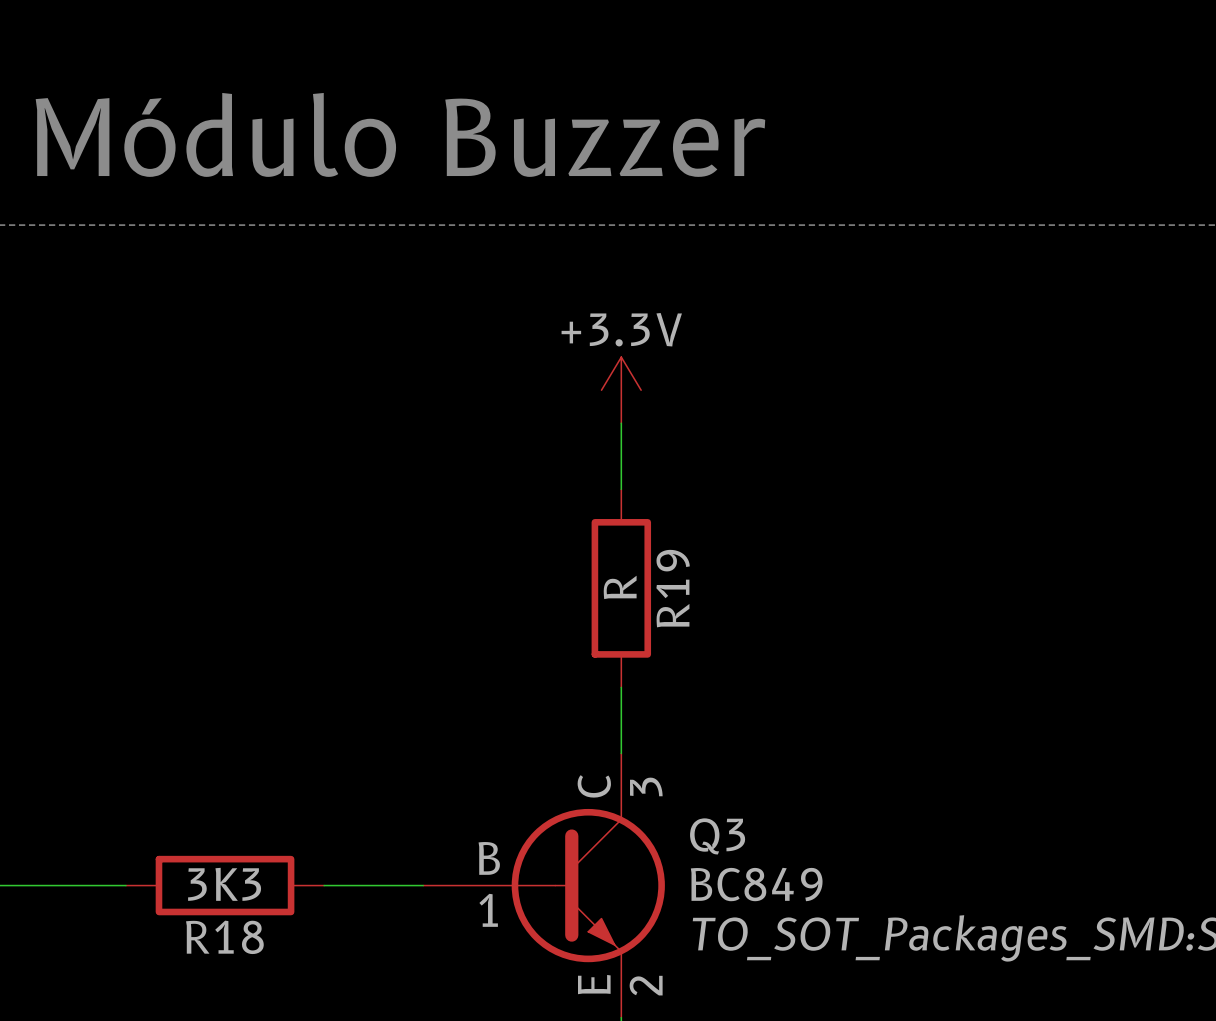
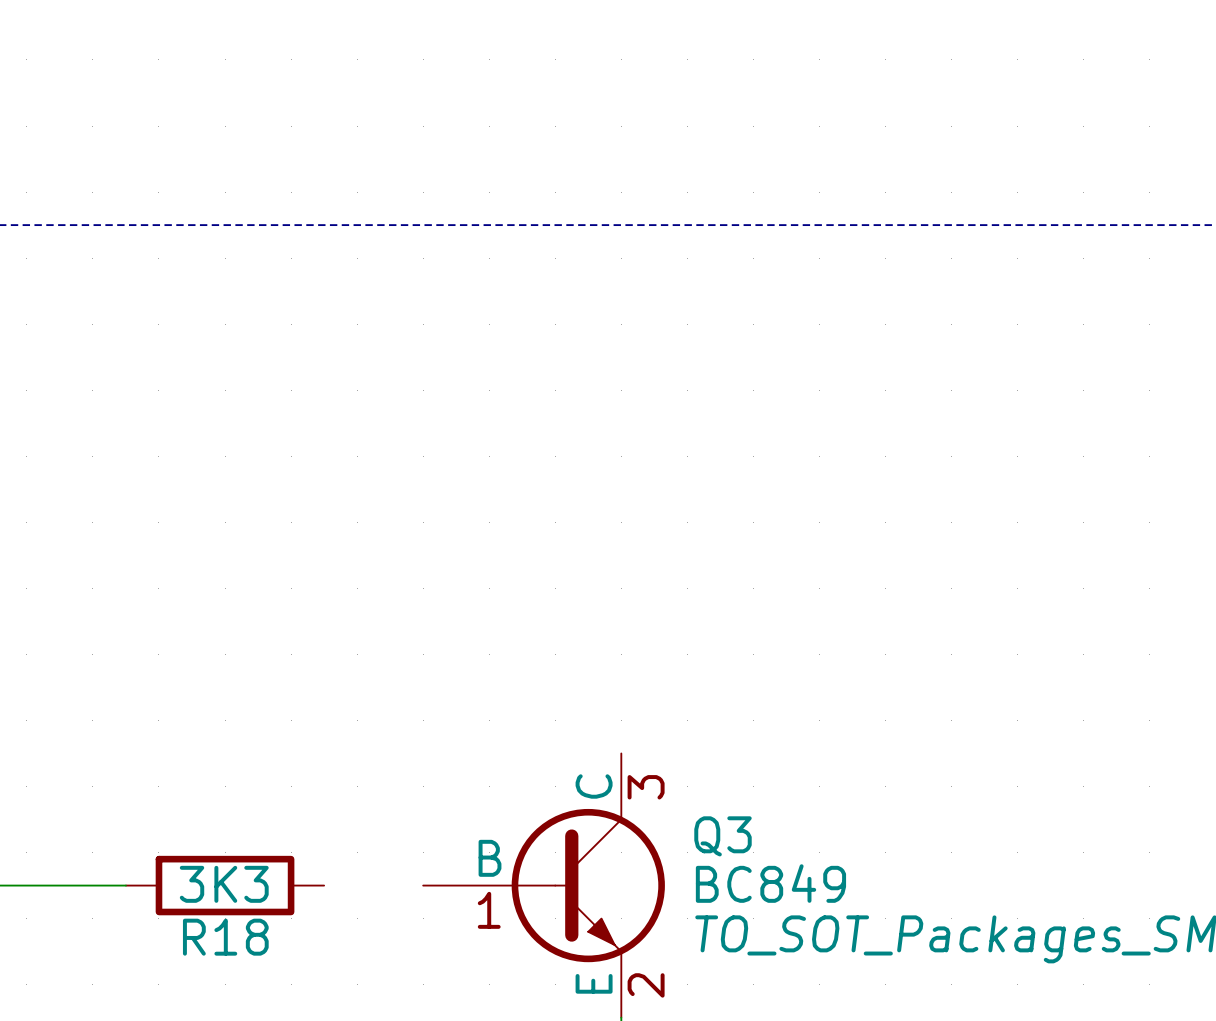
text: Módulo Buzzer (400, 134) -> none
power symbol: +3.3V (621, 390) -> none
wire: (621, 423) (621, 489) -> none
R19: R (621, 588) -> none
wire: (621, 687) (621, 753) -> none
wire: (324, 885) (423, 885) -> none

